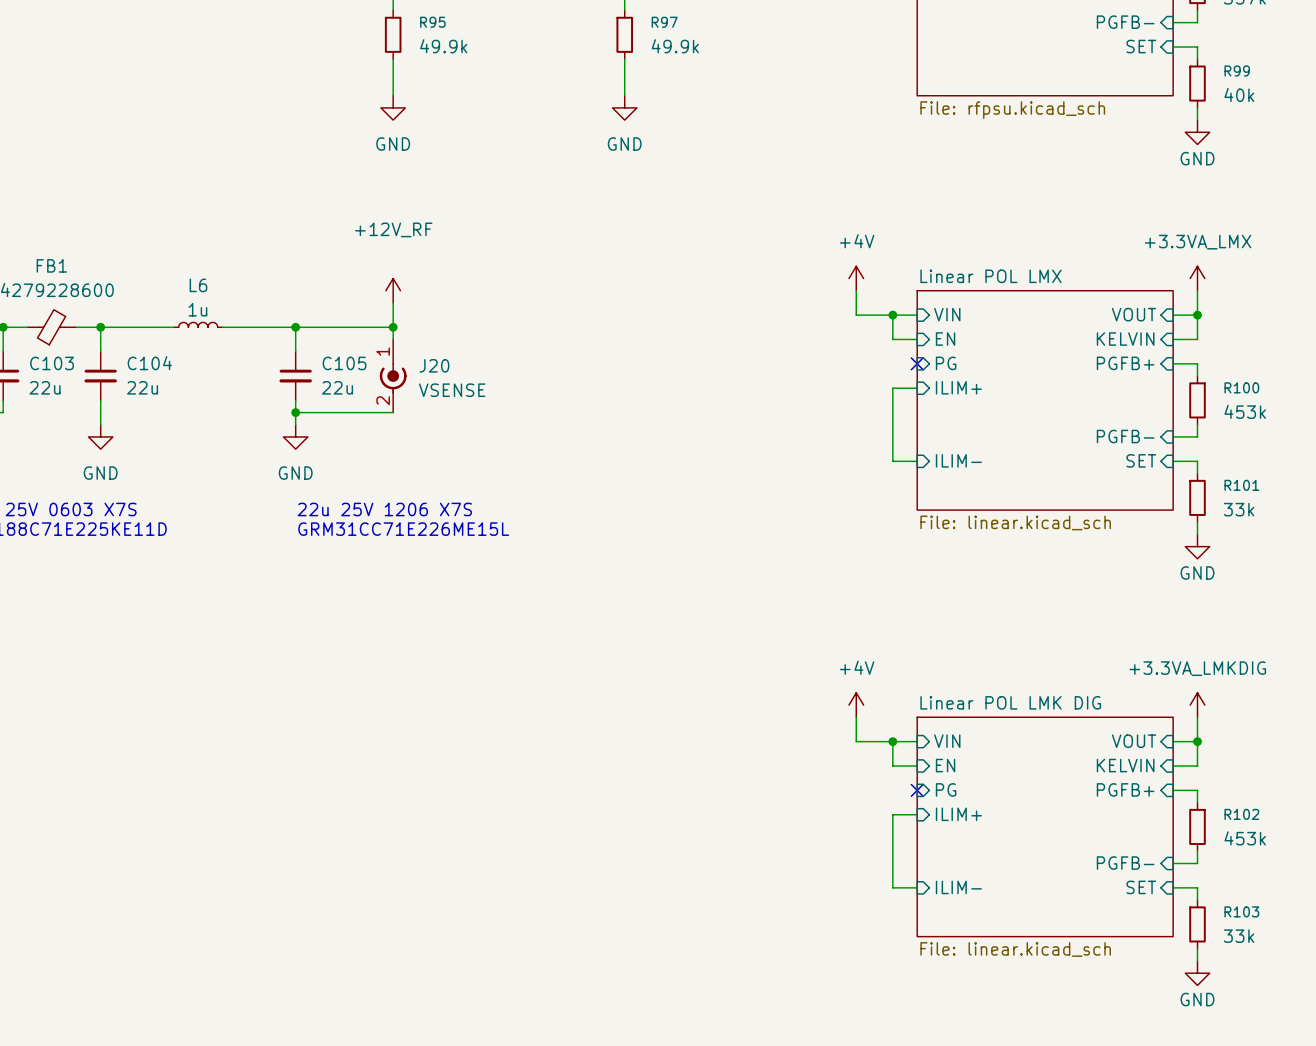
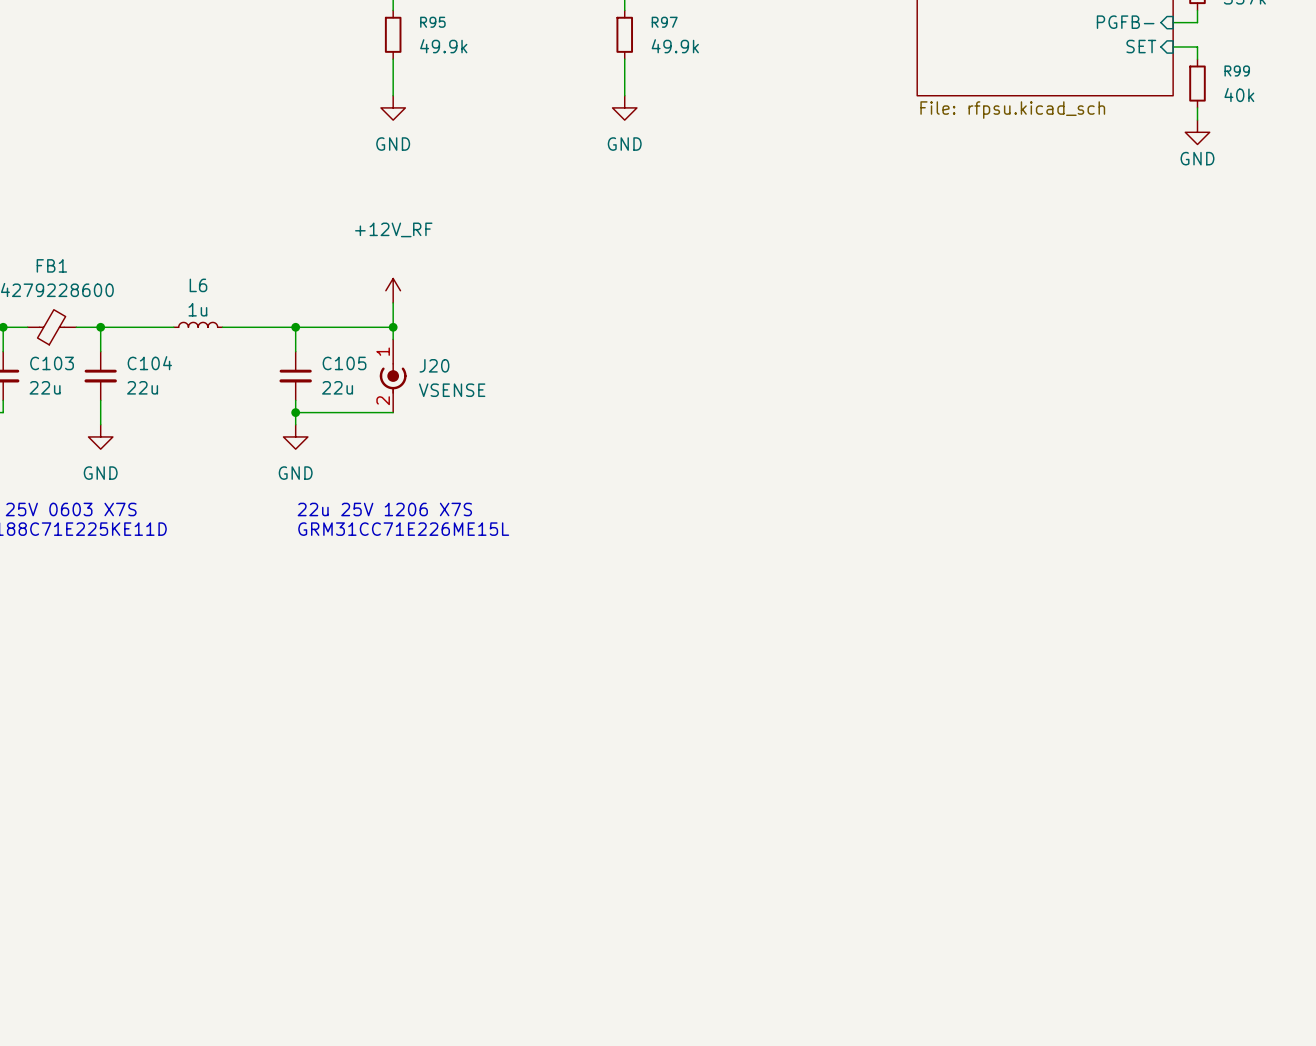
power symbol: +4V (856, 278) -> none
power symbol: +3.3VA_LMX (1197, 278) -> none
wire: (856, 290) (856, 315) (917, 315) -> none
wire: (1197, 290) (1197, 339) (1173, 339) -> none
sheet pin: VIN (947, 314) -> none
sheet pin: VOUT (1134, 314) -> none
wire: (892, 315) (892, 339) (917, 339) -> none
junction: (892, 315) -> none
wire: (1173, 315) (1197, 315) -> none
junction: (1197, 315) -> none
sheet pin: EN (945, 339) -> none
sheet pin: KELVIN (1125, 339) -> none
no-connect mark: (917, 363) -> none
sheet pin: PG (946, 363) -> none
sheet pin: PGFB+ (1125, 363) -> none
wire: (1173, 363) (1197, 363) (1197, 376) -> none
sheet pin: ILIM+ (958, 387) -> none
wire: (917, 388) (892, 388) (892, 461) (917, 461) -> none
sheet Linear POL LMX: File: linear.kicad_sch (1045, 400) -> none
R100: 453k (1197, 400) -> none
wire: (1197, 424) (1197, 436) (1173, 436) -> none
sheet pin: PGFB- (1125, 436) -> none
sheet pin: ILIM- (958, 460) -> none
sheet pin: SET (1141, 460) -> none
wire: (1173, 461) (1197, 461) (1197, 473) -> none
R101: 33k (1197, 497) -> none
wire: (1197, 522) (1197, 534) -> none
power symbol: GND (1197, 546) -> none
power symbol: +4V (856, 705) -> none
power symbol: +3.3VA_LMKDIG (1197, 705) -> none
wire: (856, 717) (856, 741) (917, 741) -> none
wire: (1197, 717) (1197, 766) (1173, 766) -> none
wire: (892, 741) (892, 766) (917, 766) -> none
junction: (892, 741) -> none
sheet pin: VIN (947, 741) -> none
sheet pin: VOUT (1134, 741) -> none
wire: (1173, 741) (1197, 741) -> none
junction: (1197, 741) -> none
sheet pin: EN (945, 765) -> none
sheet pin: KELVIN (1125, 765) -> none
sheet pin: PG (946, 789) -> none
sheet pin: PGFB+ (1125, 789) -> none
no-connect mark: (917, 790) -> none
wire: (1173, 790) (1197, 790) (1197, 802) -> none
wire: (917, 814) (892, 814) (892, 887) (917, 887) -> none
sheet pin: ILIM+ (958, 814) -> none
sheet Linear POL LMK DIG: File: linear.kicad_sch (1045, 826) -> none
R102: 453k (1197, 826) -> none
wire: (1197, 851) (1197, 863) (1173, 863) -> none
sheet pin: PGFB- (1125, 863) -> none
sheet pin: ILIM- (958, 887) -> none
sheet pin: SET (1141, 887) -> none
wire: (1173, 887) (1197, 887) (1197, 900) -> none
R103: 33k (1197, 924) -> none
wire: (1197, 948) (1197, 961) -> none
power symbol: GND (1197, 973) -> none

